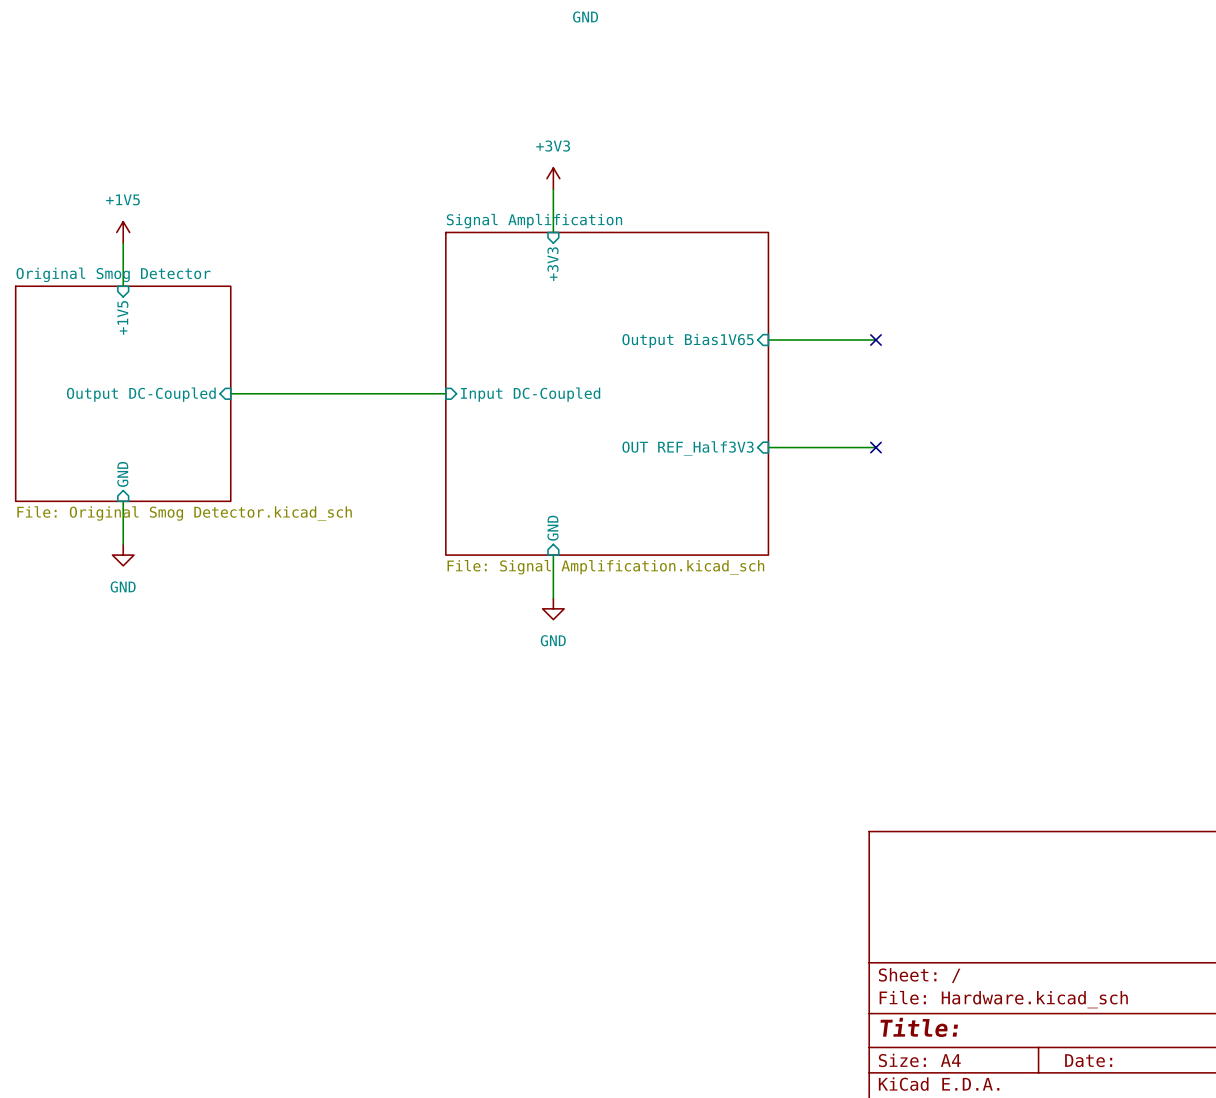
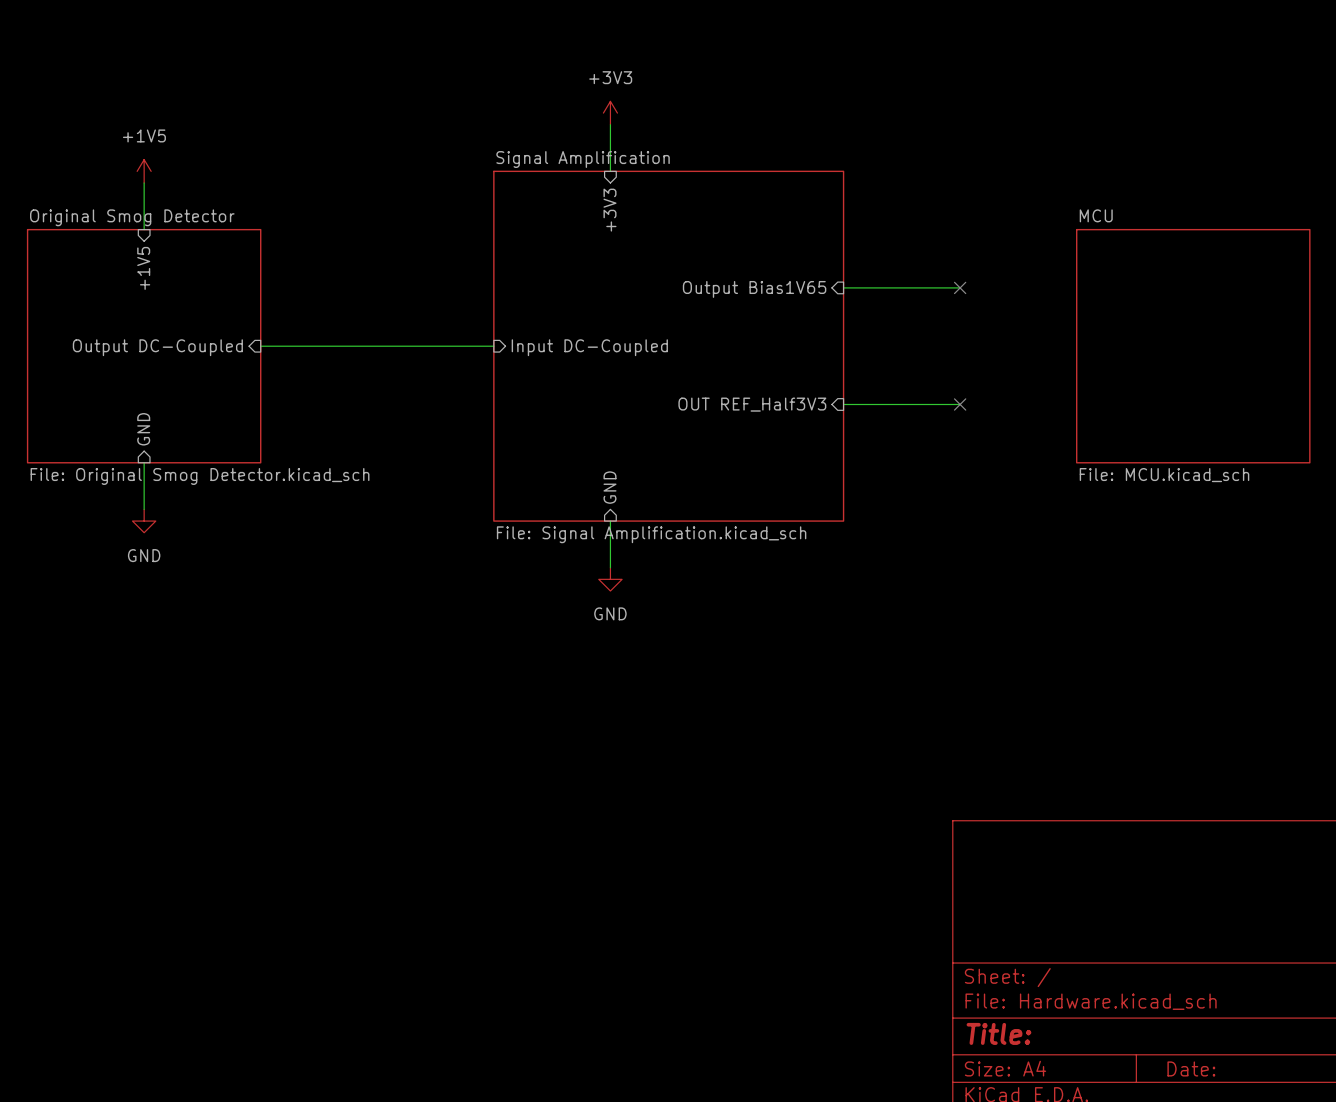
sheet MCU: none -> File: MCU.kicad_sch (1193, 346)

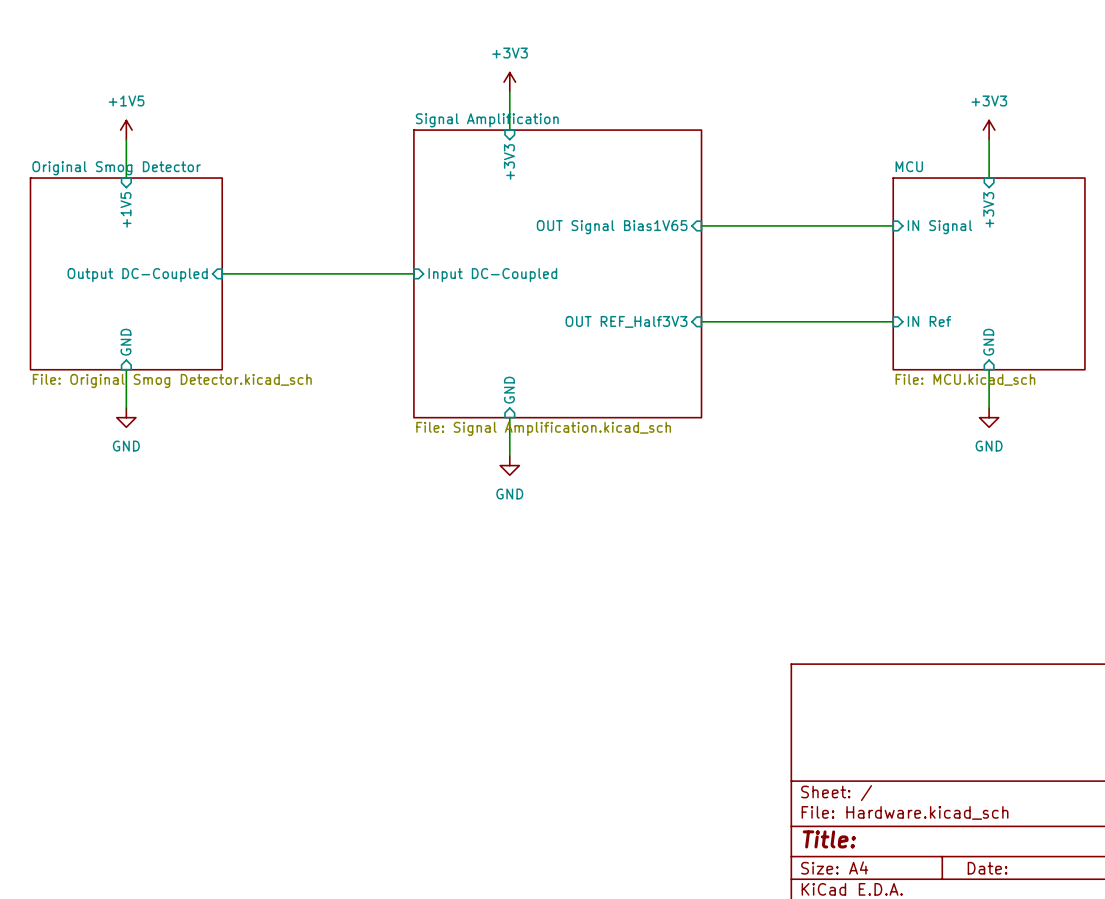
power symbol: none -> +3V3 (989, 130)
wire: none -> (989, 139) (989, 178)
sheet pin: none -> +3V3 (988, 209)
wire: none -> (797, 225) (893, 225)
no-connect mark: (960, 287) -> none
sheet pin: Output Bias1V65 (754, 289) -> OUT Signal Bias1V65 (612, 227)
sheet pin: none -> IN Signal (939, 227)
wire: none -> (797, 321) (893, 321)
no-connect mark: (960, 404) -> none
sheet pin: none -> IN Ref (929, 321)
sheet pin: none -> GND (988, 342)
wire: none -> (989, 369) (989, 408)
power symbol: none -> GND (989, 417)

